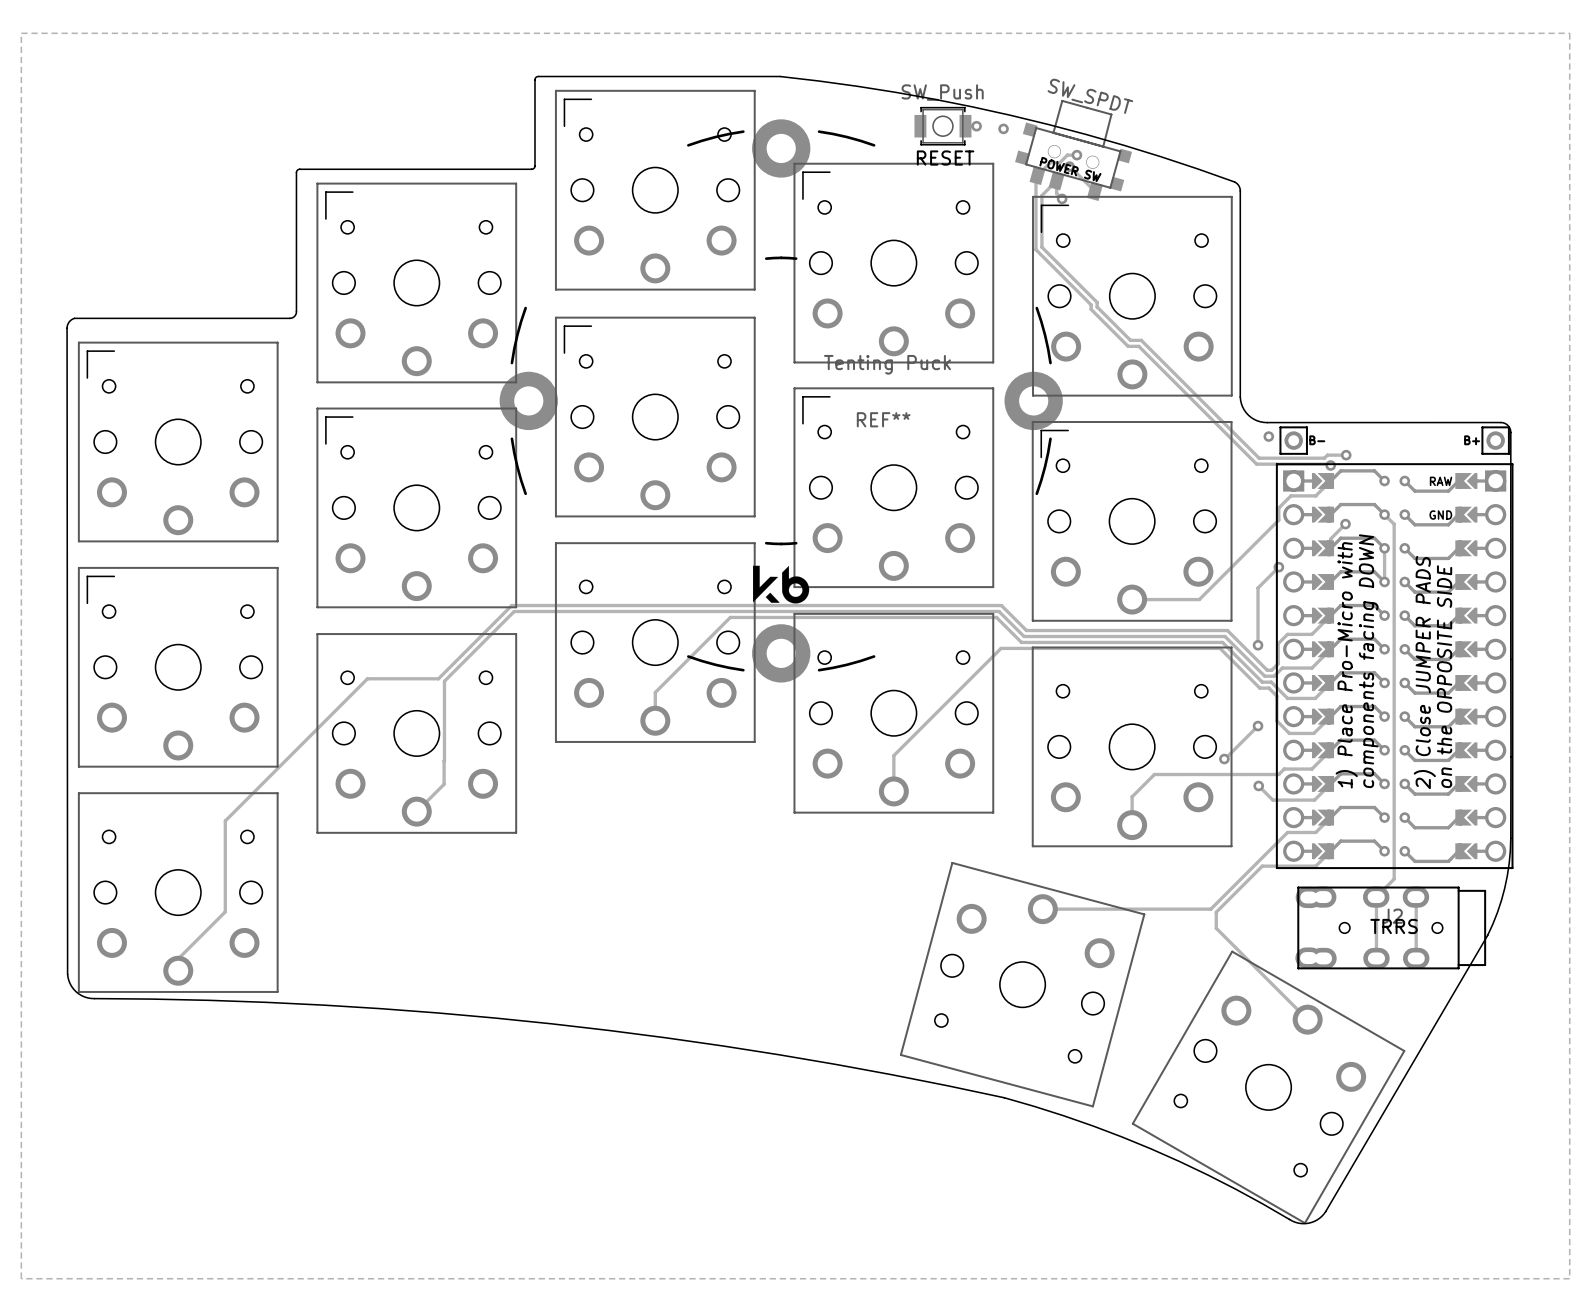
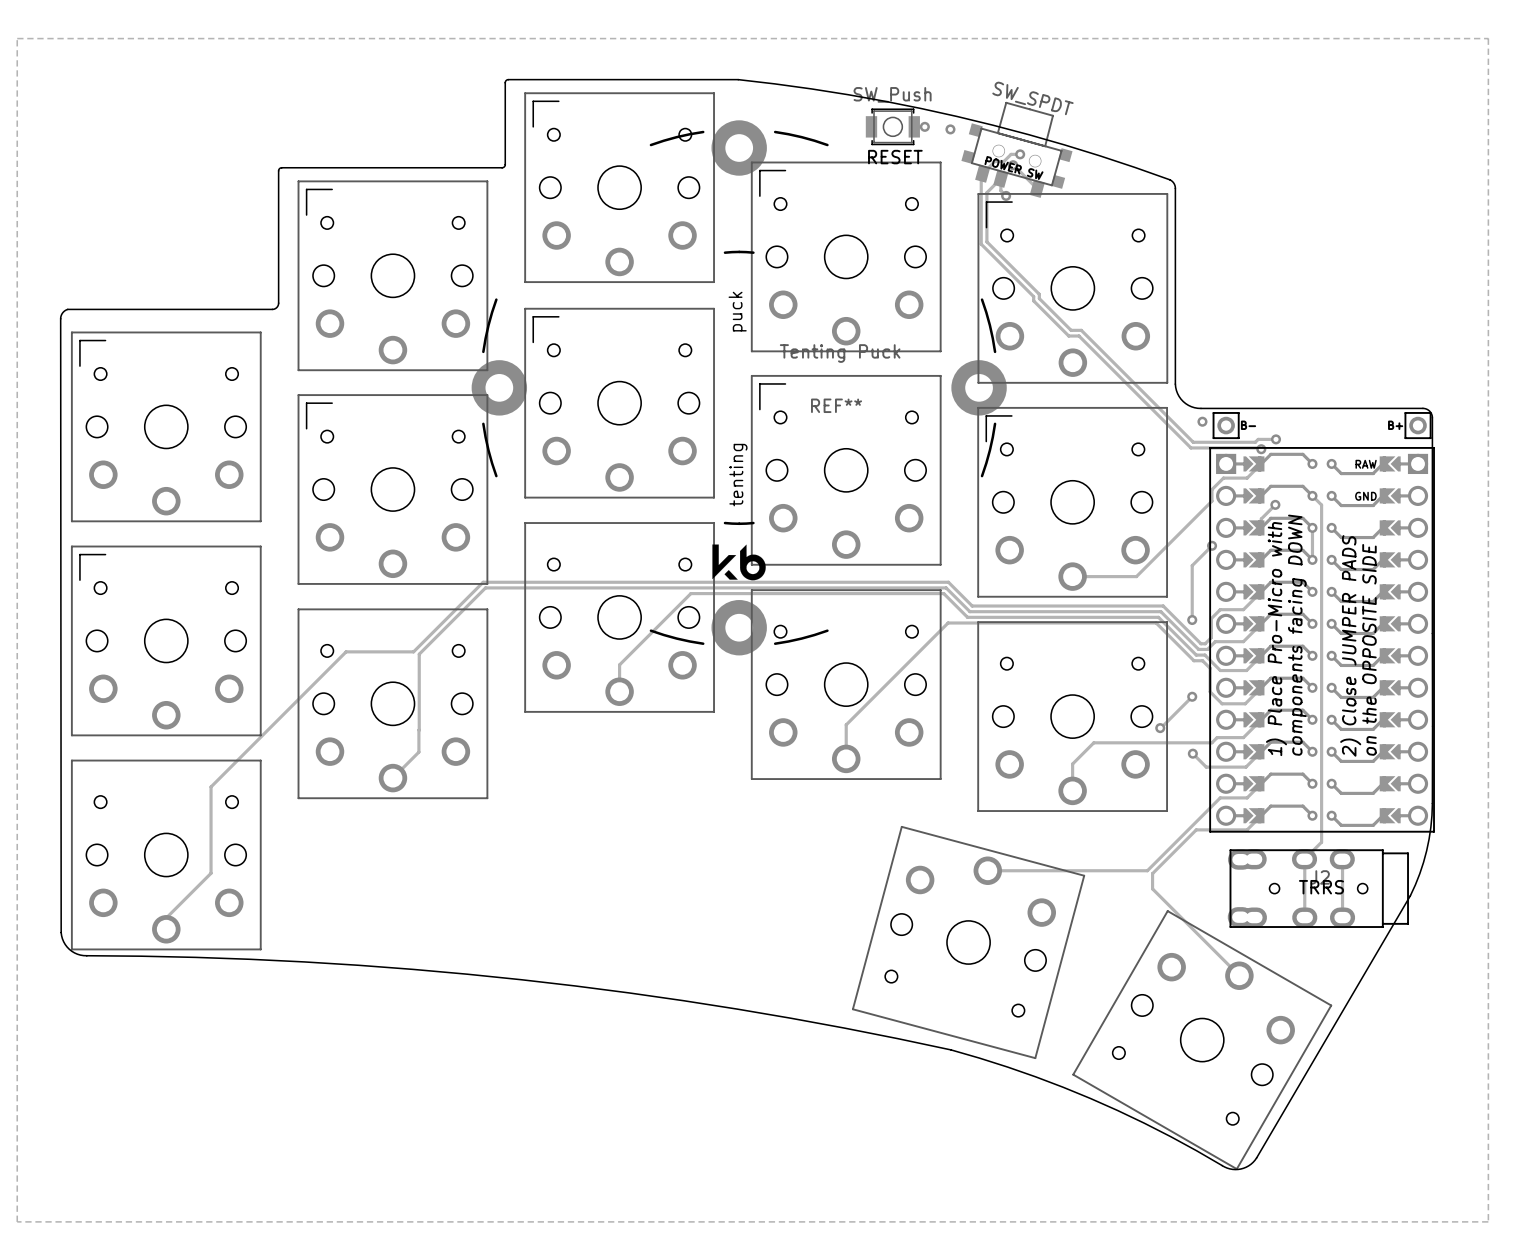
REF** text: none -> puck (737, 311)
REF** text: none -> tenting (738, 475)

